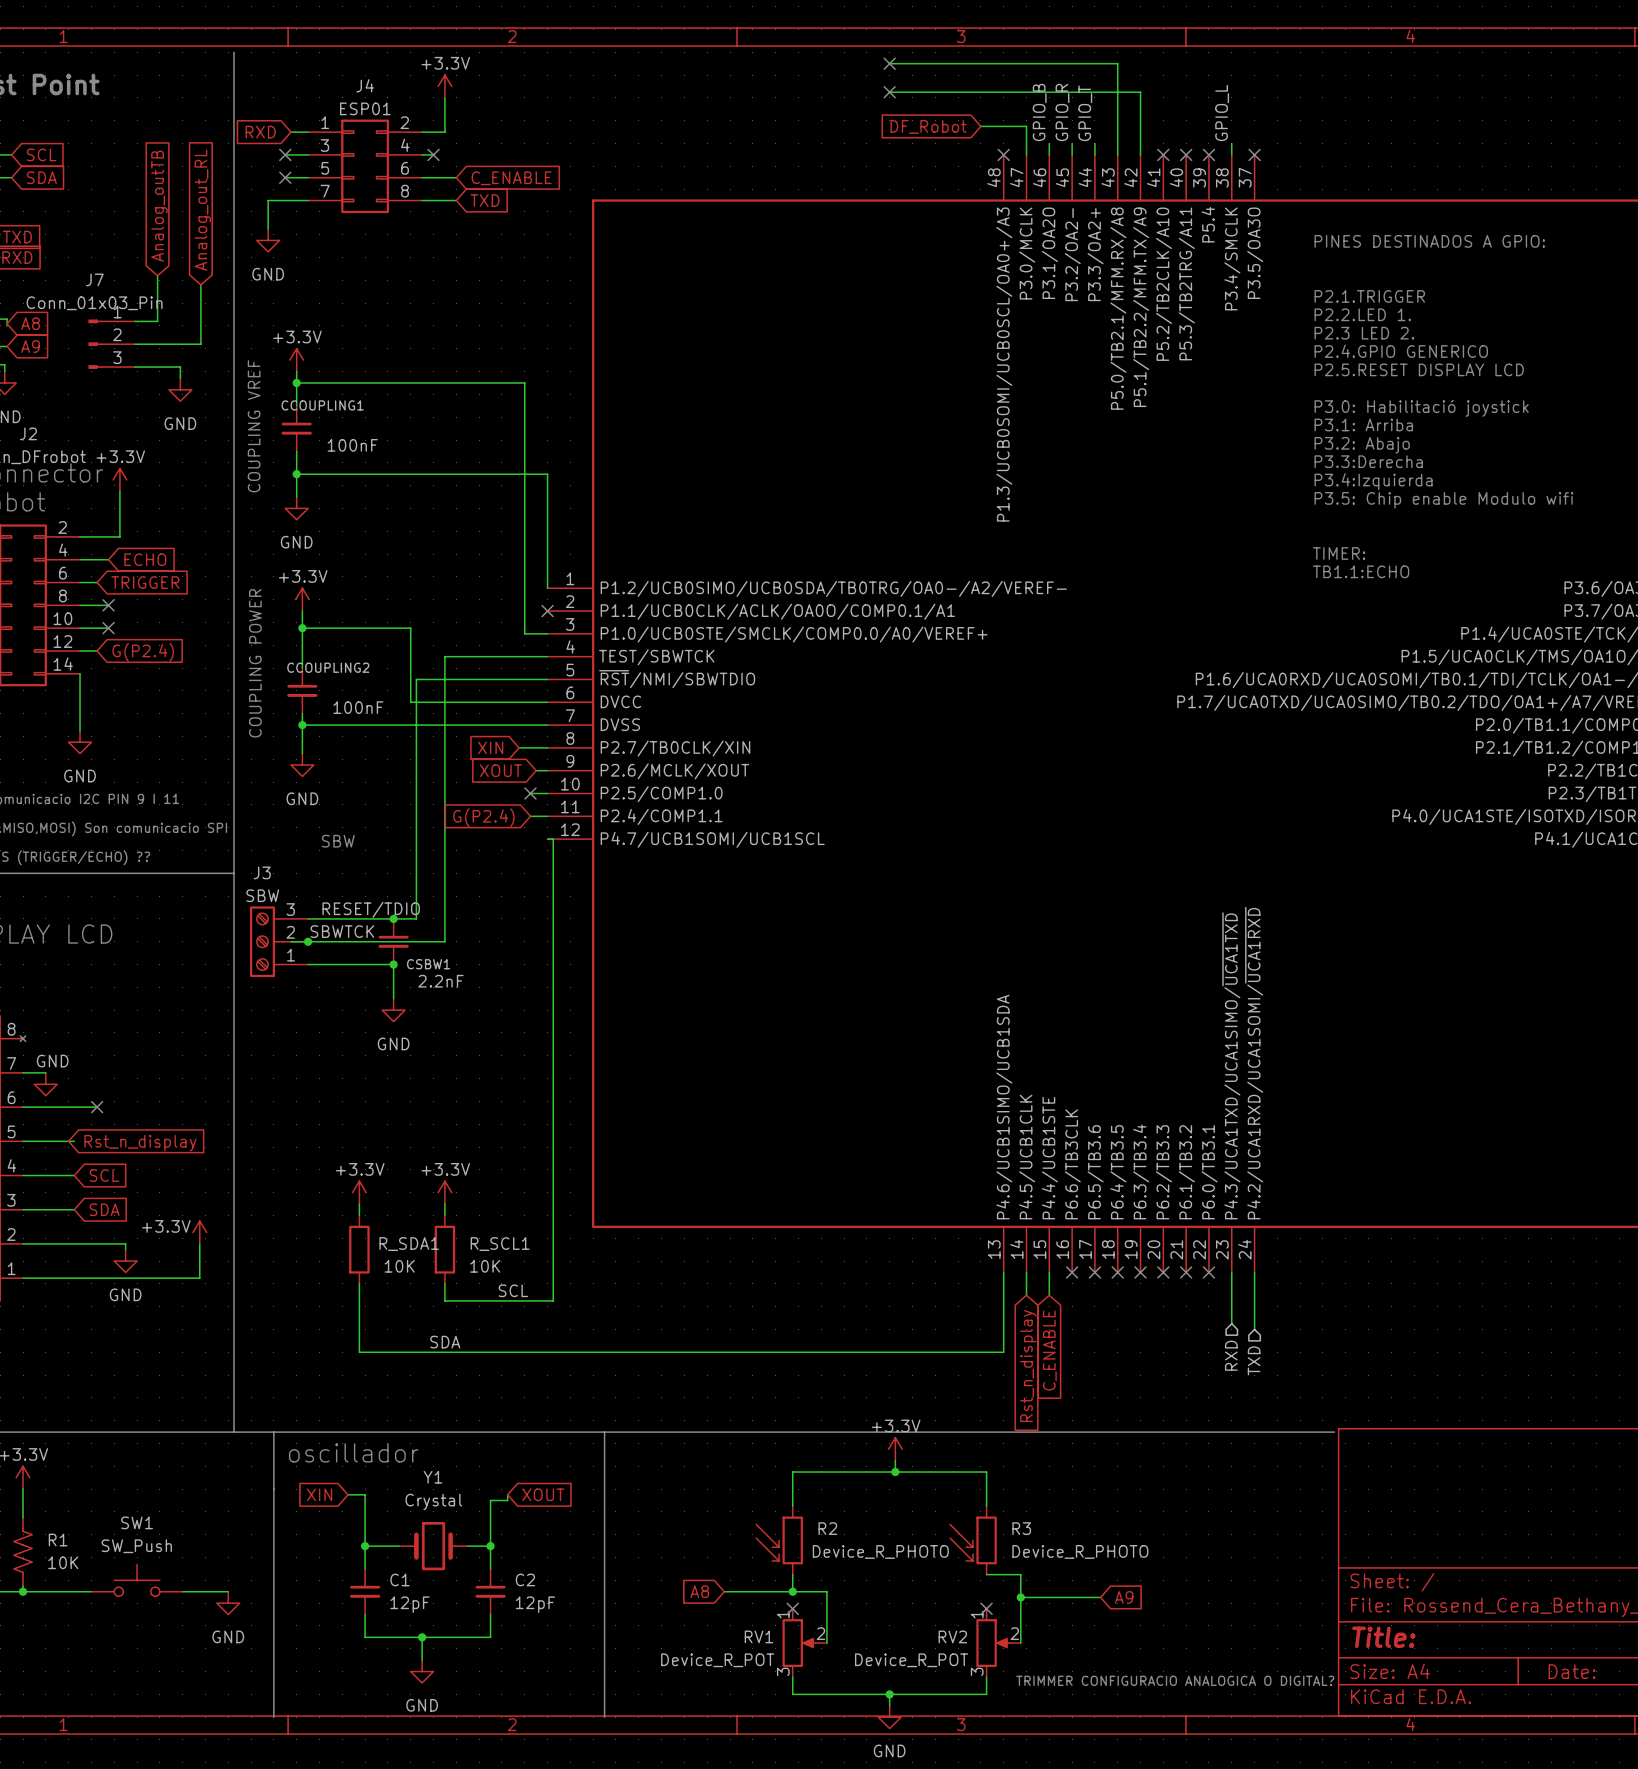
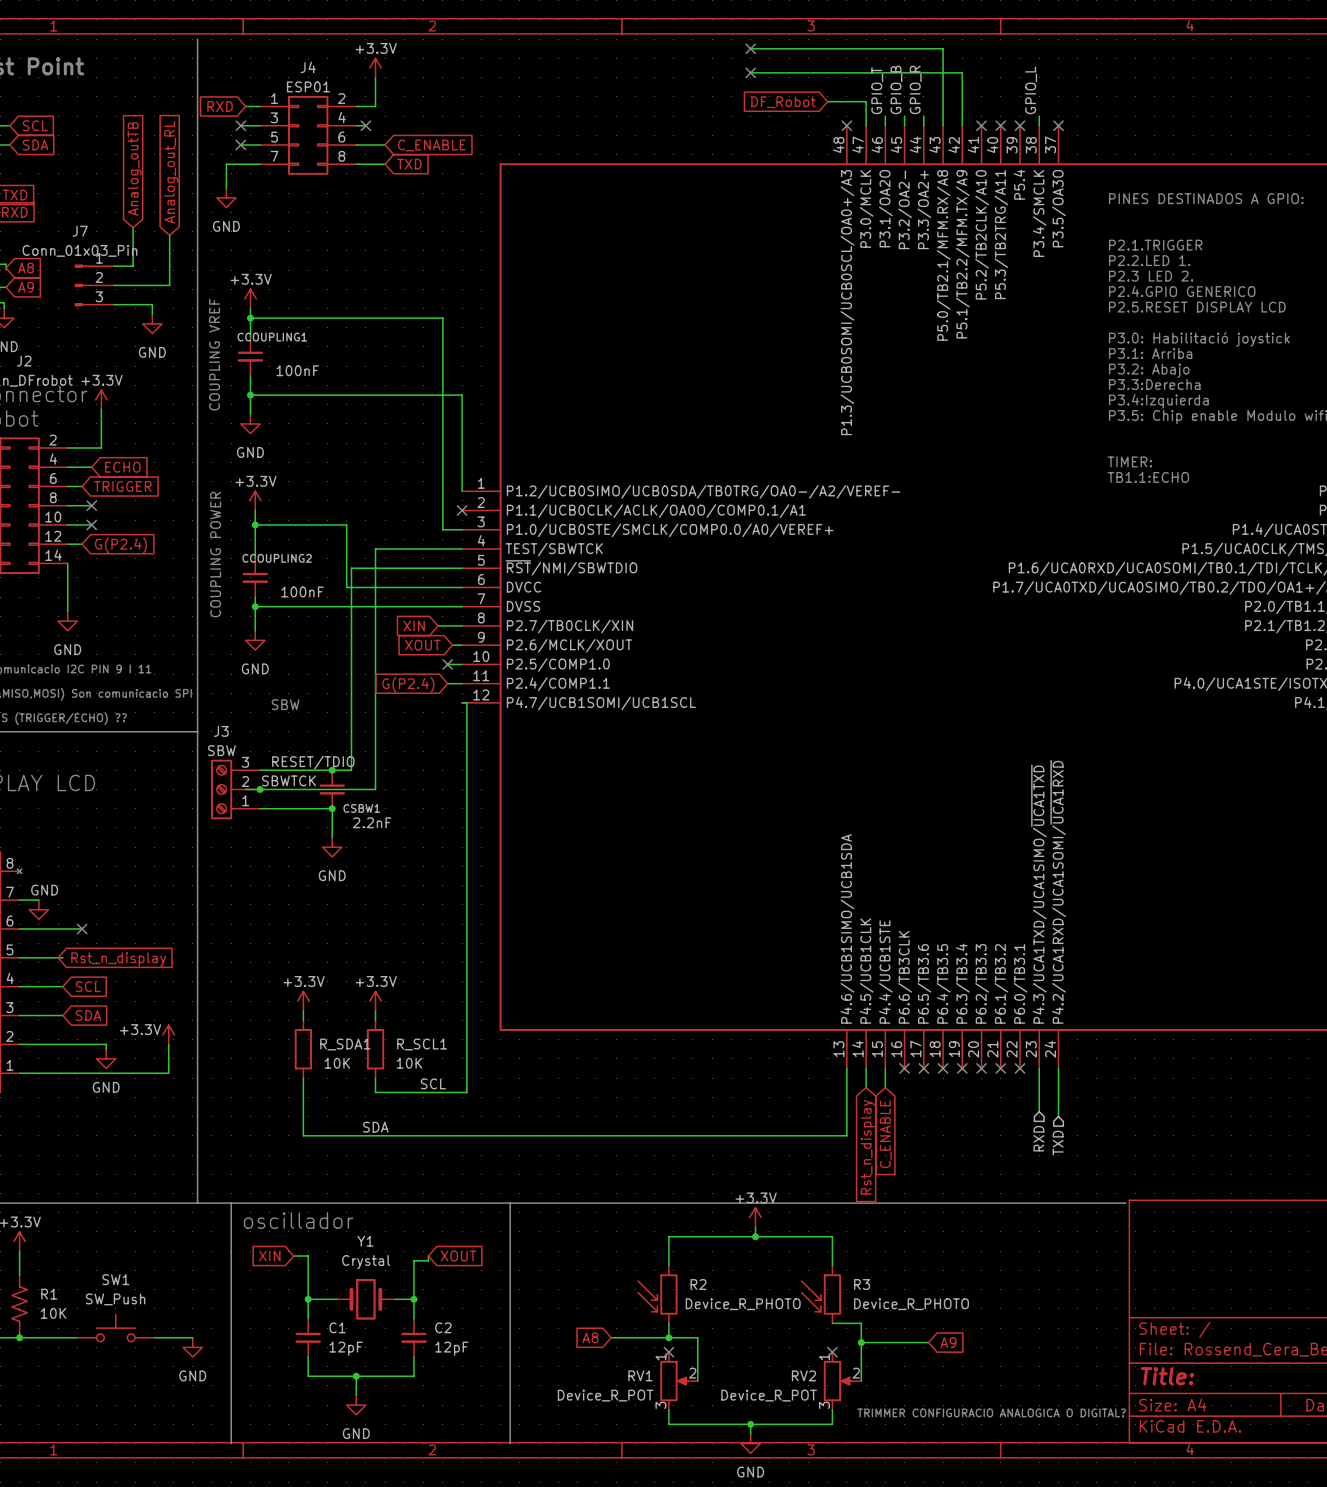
label: GPIO_B (1039, 112) -> GPIO_T (877, 90)
label: GPIO_R (1062, 112) -> GPIO_B (896, 89)
label: GPIO_T (1085, 113) -> GPIO_R (915, 89)

